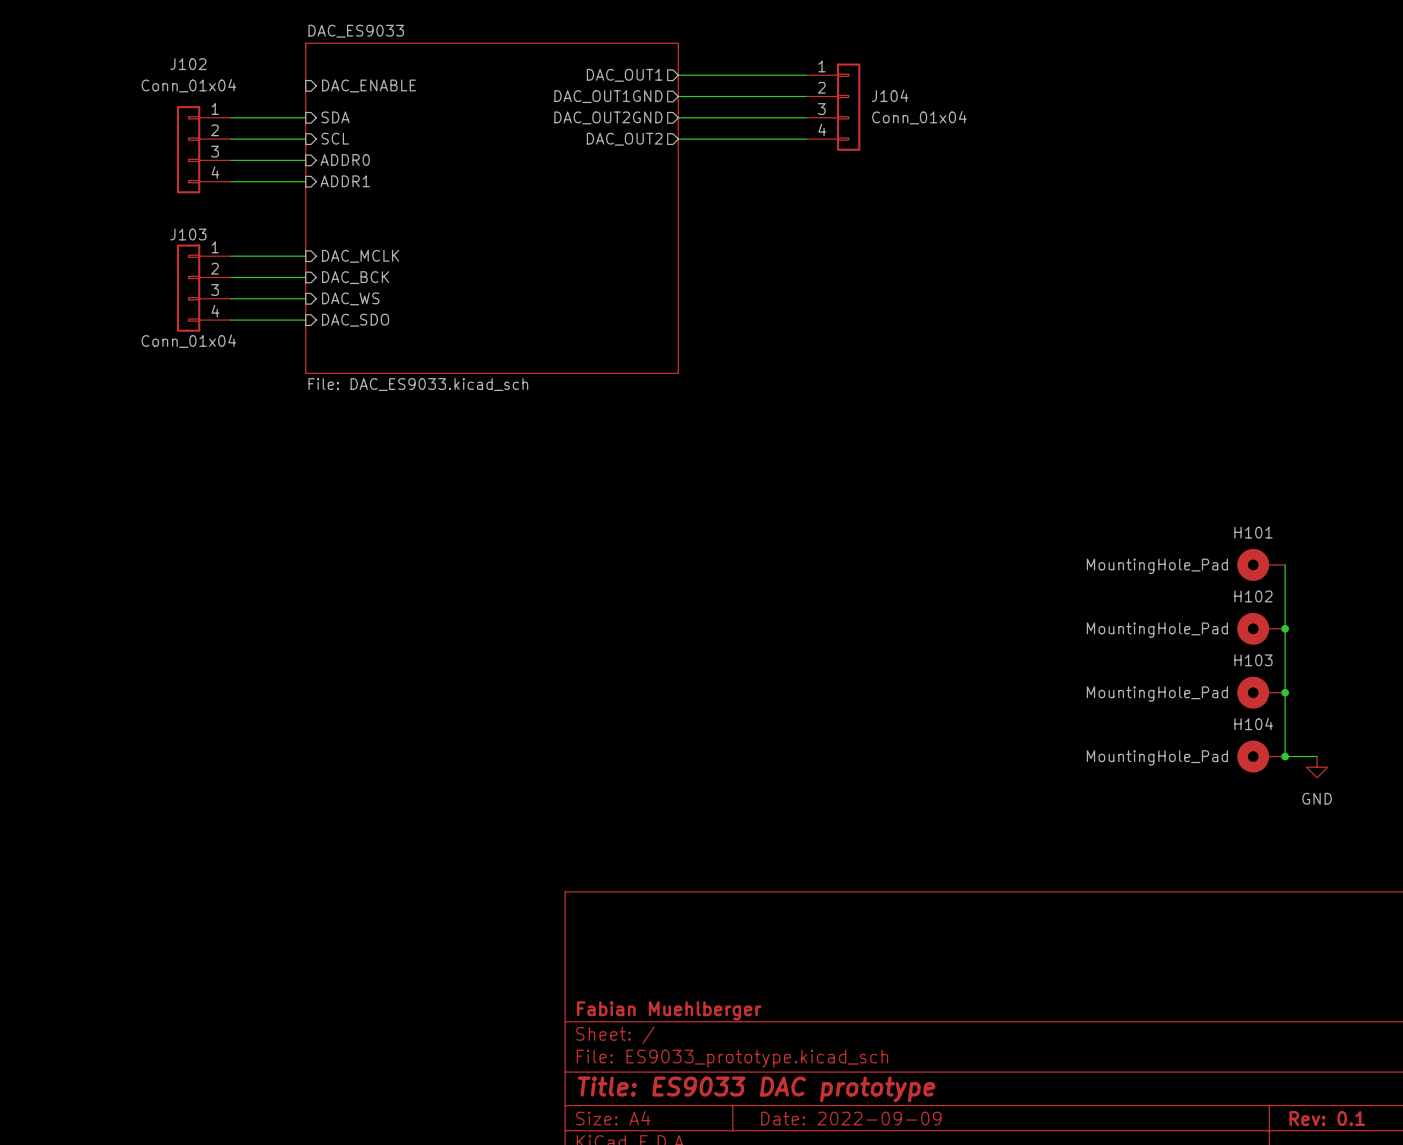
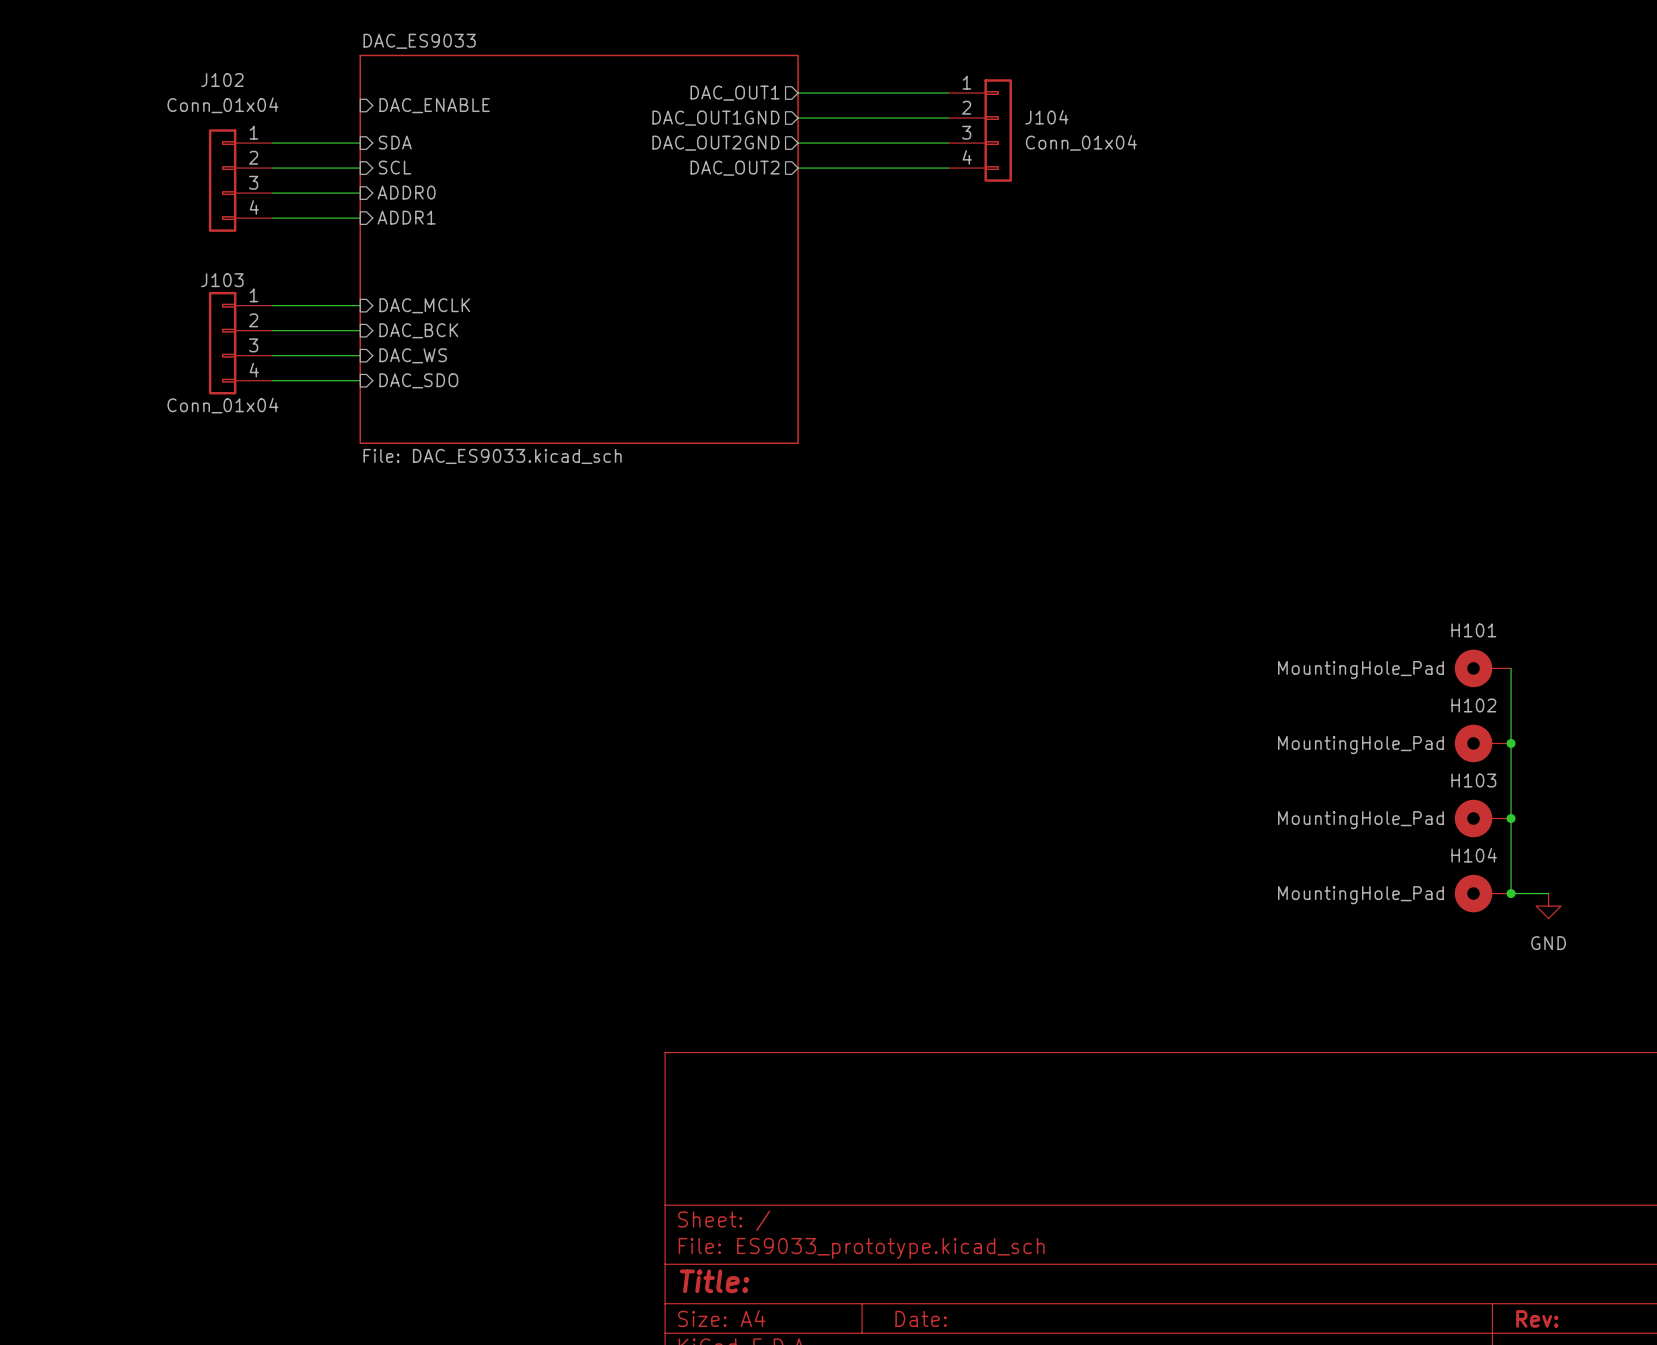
title block: Fabian Muehlberger (669, 1010) -> none
title block: Title: ES9033 DAC prototype (756, 1089) -> Title: (714, 1281)
title block: Date: 2022-09-09 (851, 1118) -> Date: (921, 1318)
title block: Rev: 0.1 (1327, 1118) -> Rev: (1537, 1318)

